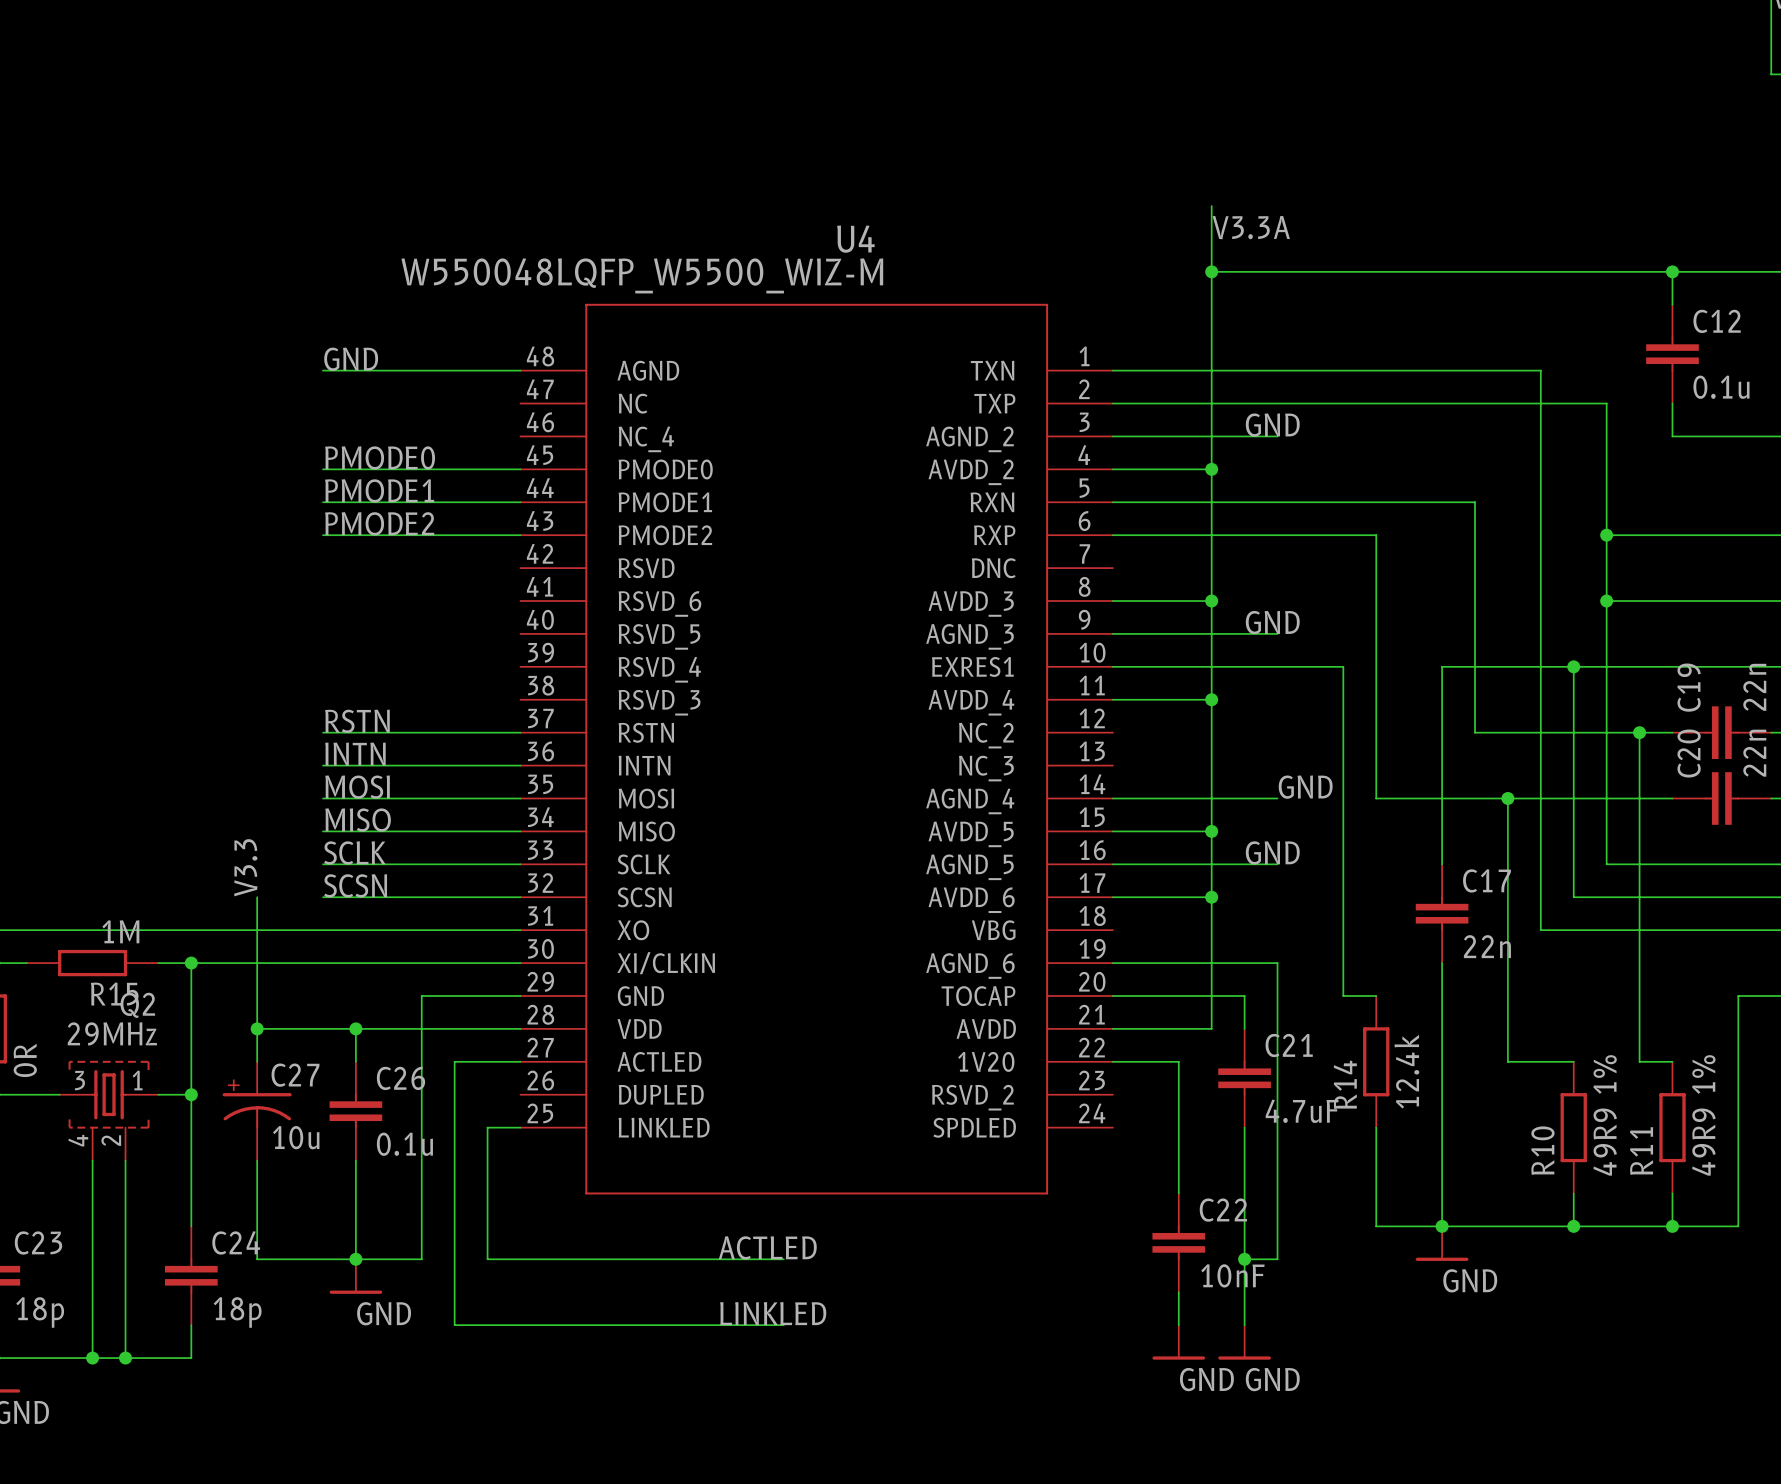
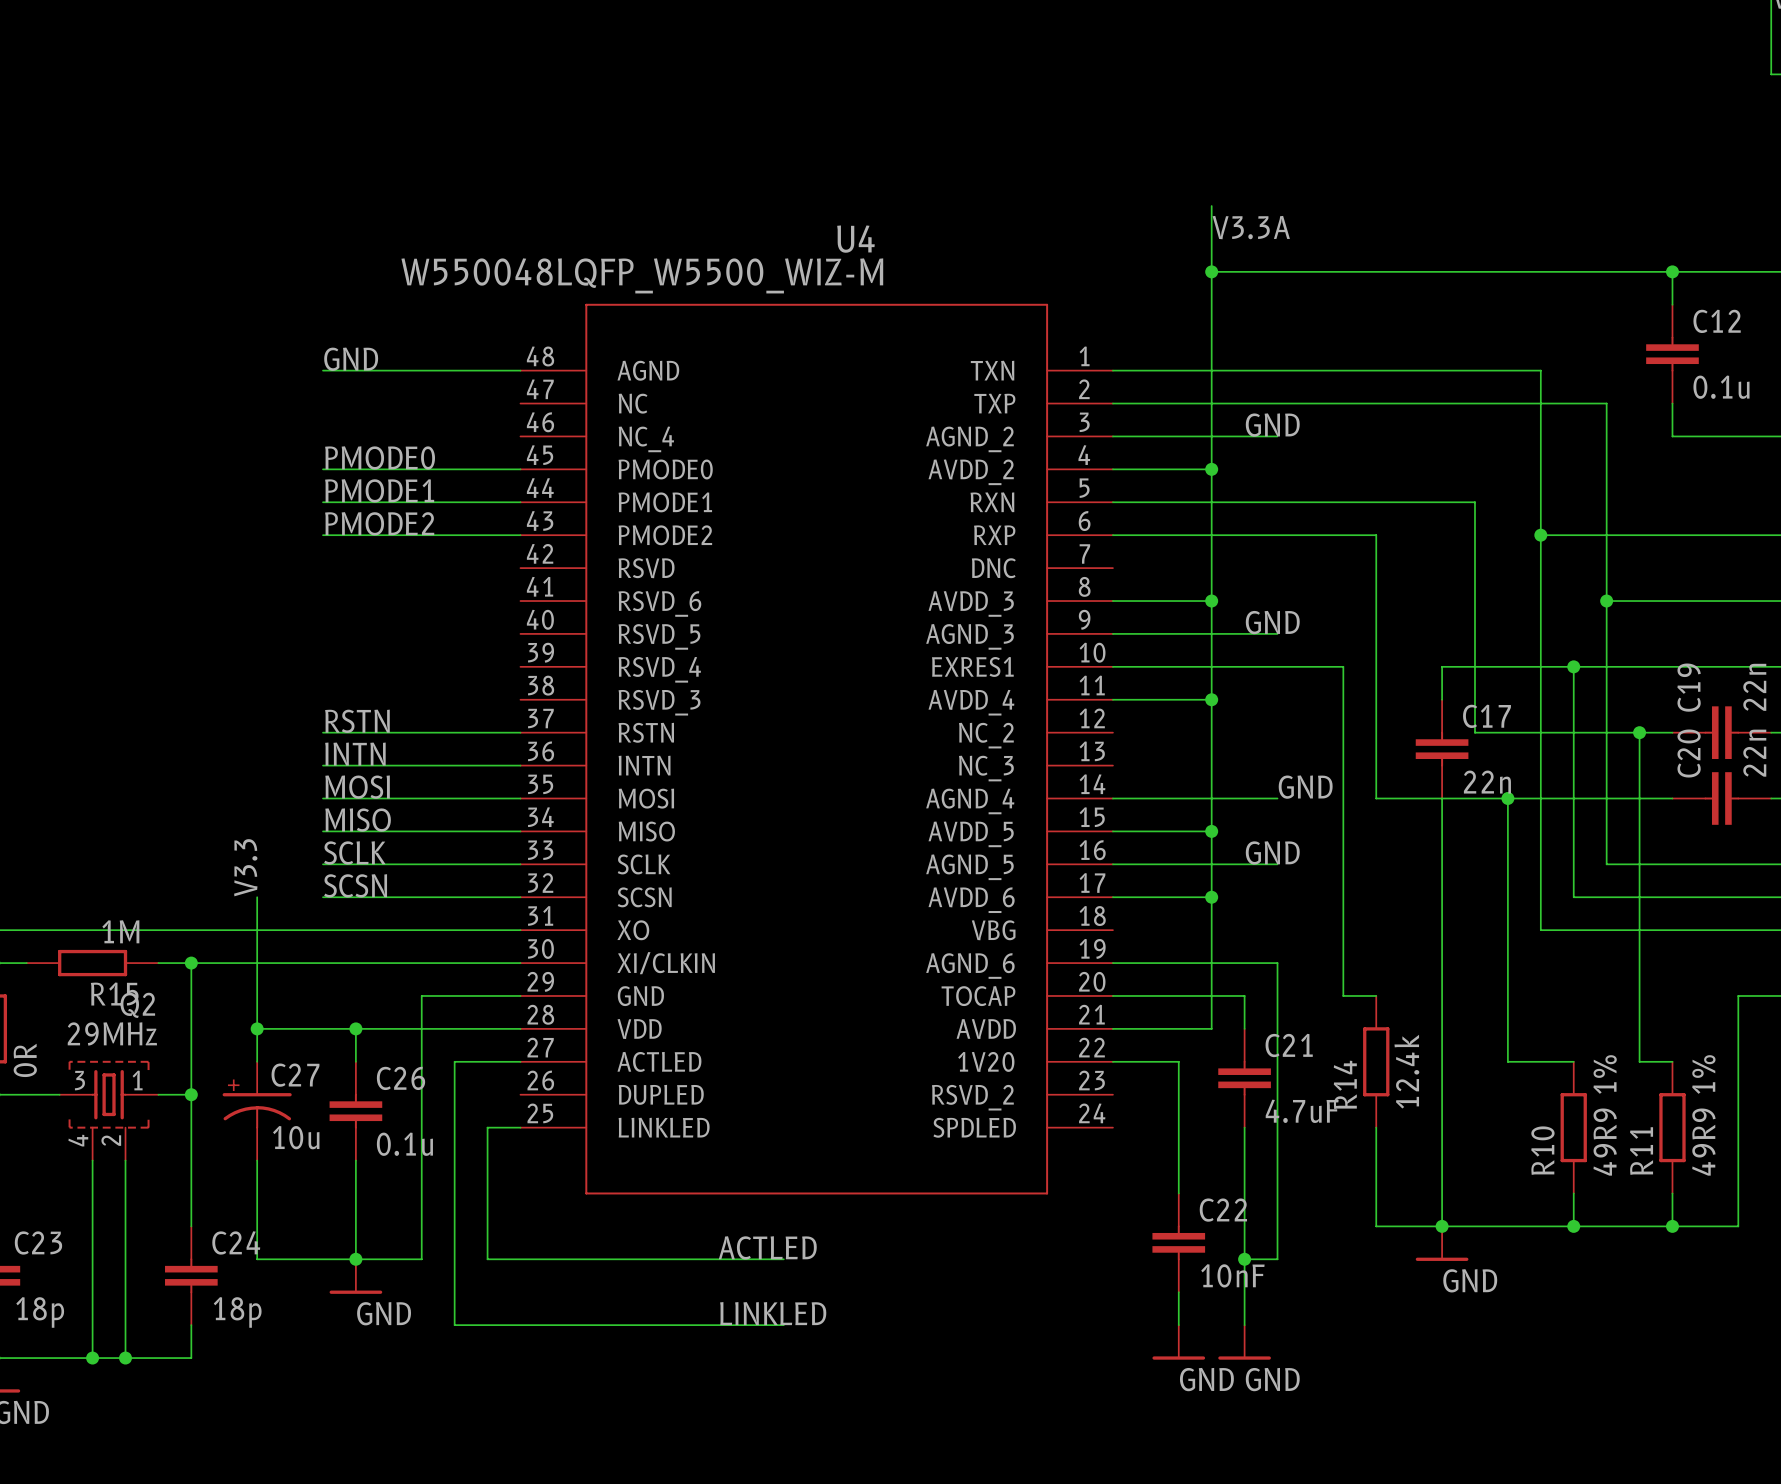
wire: none -> (1540, 535) (1606, 535)
junction position: (1606, 535) -> (1540, 535)
C17 position: (1442, 913) -> (1442, 749)

